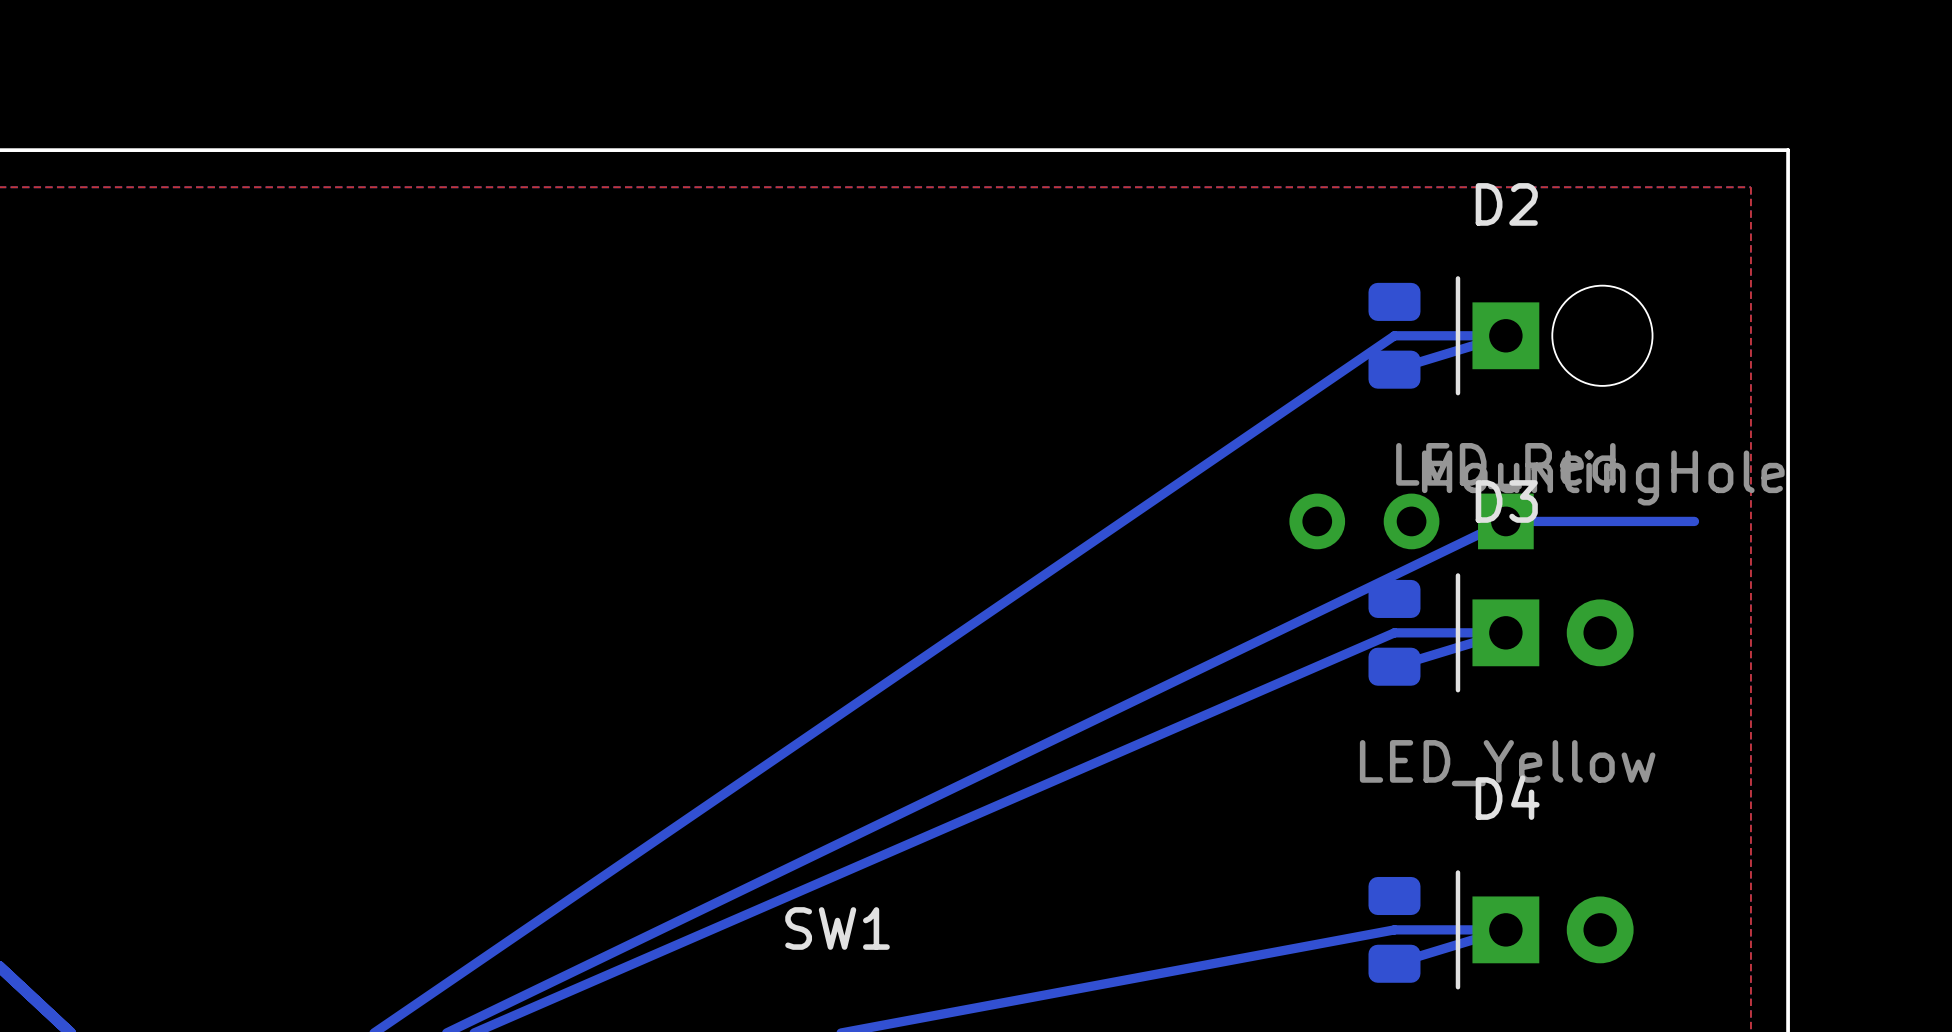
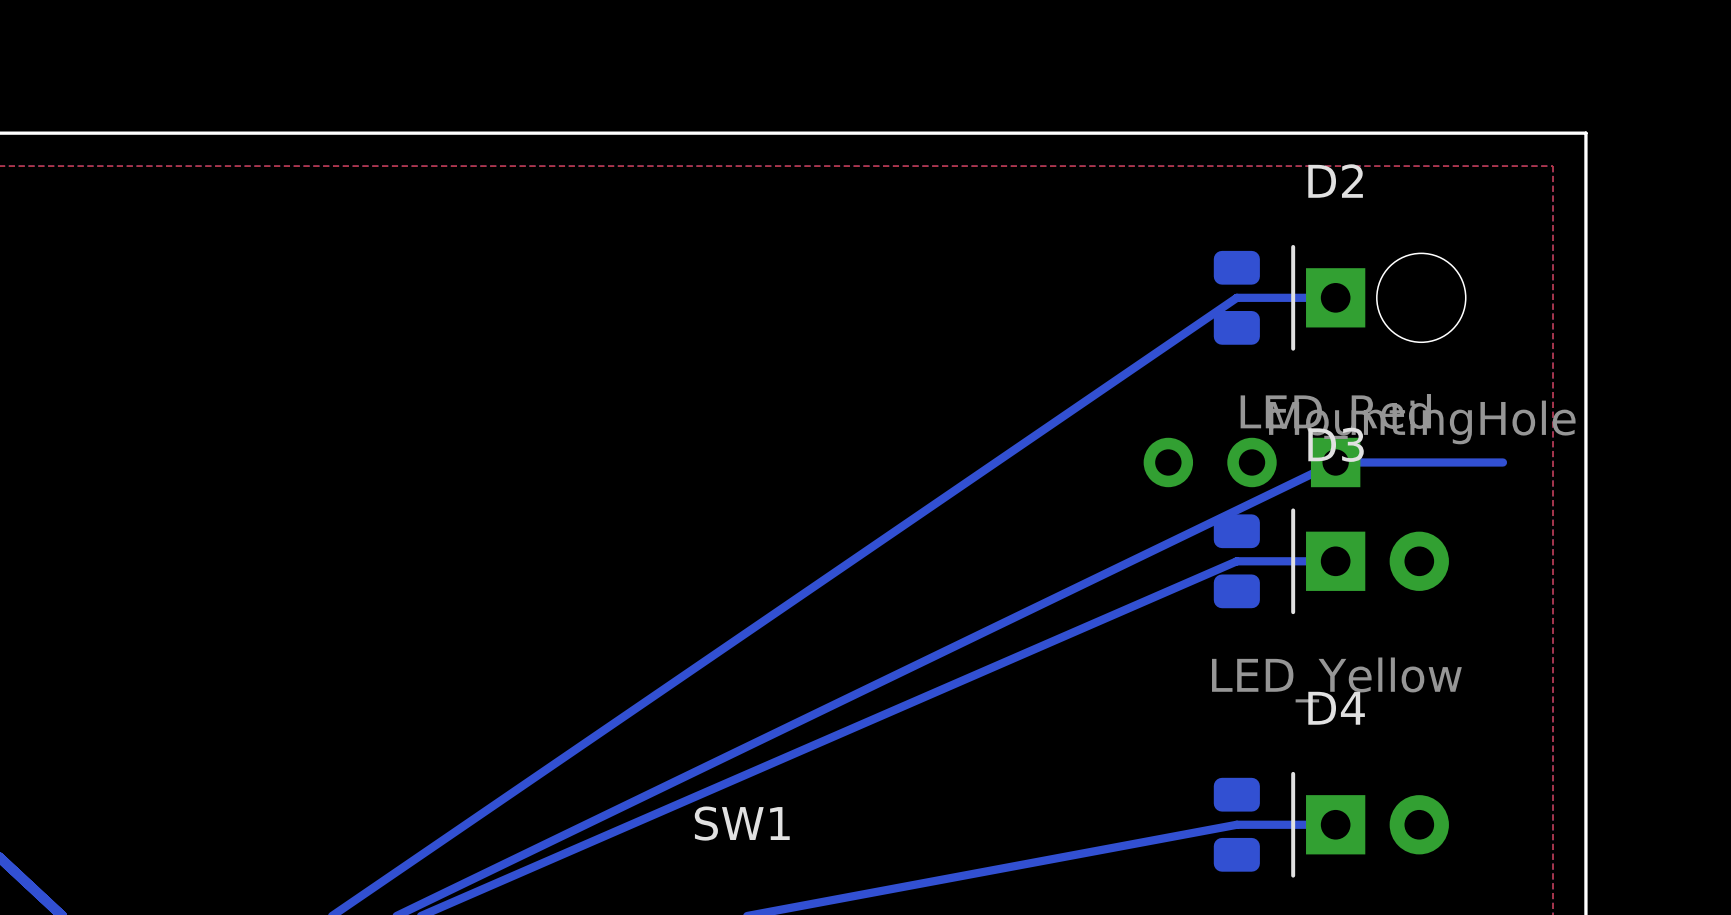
bottom track: (1505, 335) (1394, 369) -> none
bottom track: (1505, 632) (1394, 666) -> none
bottom track: (1505, 929) (1394, 963) -> none

